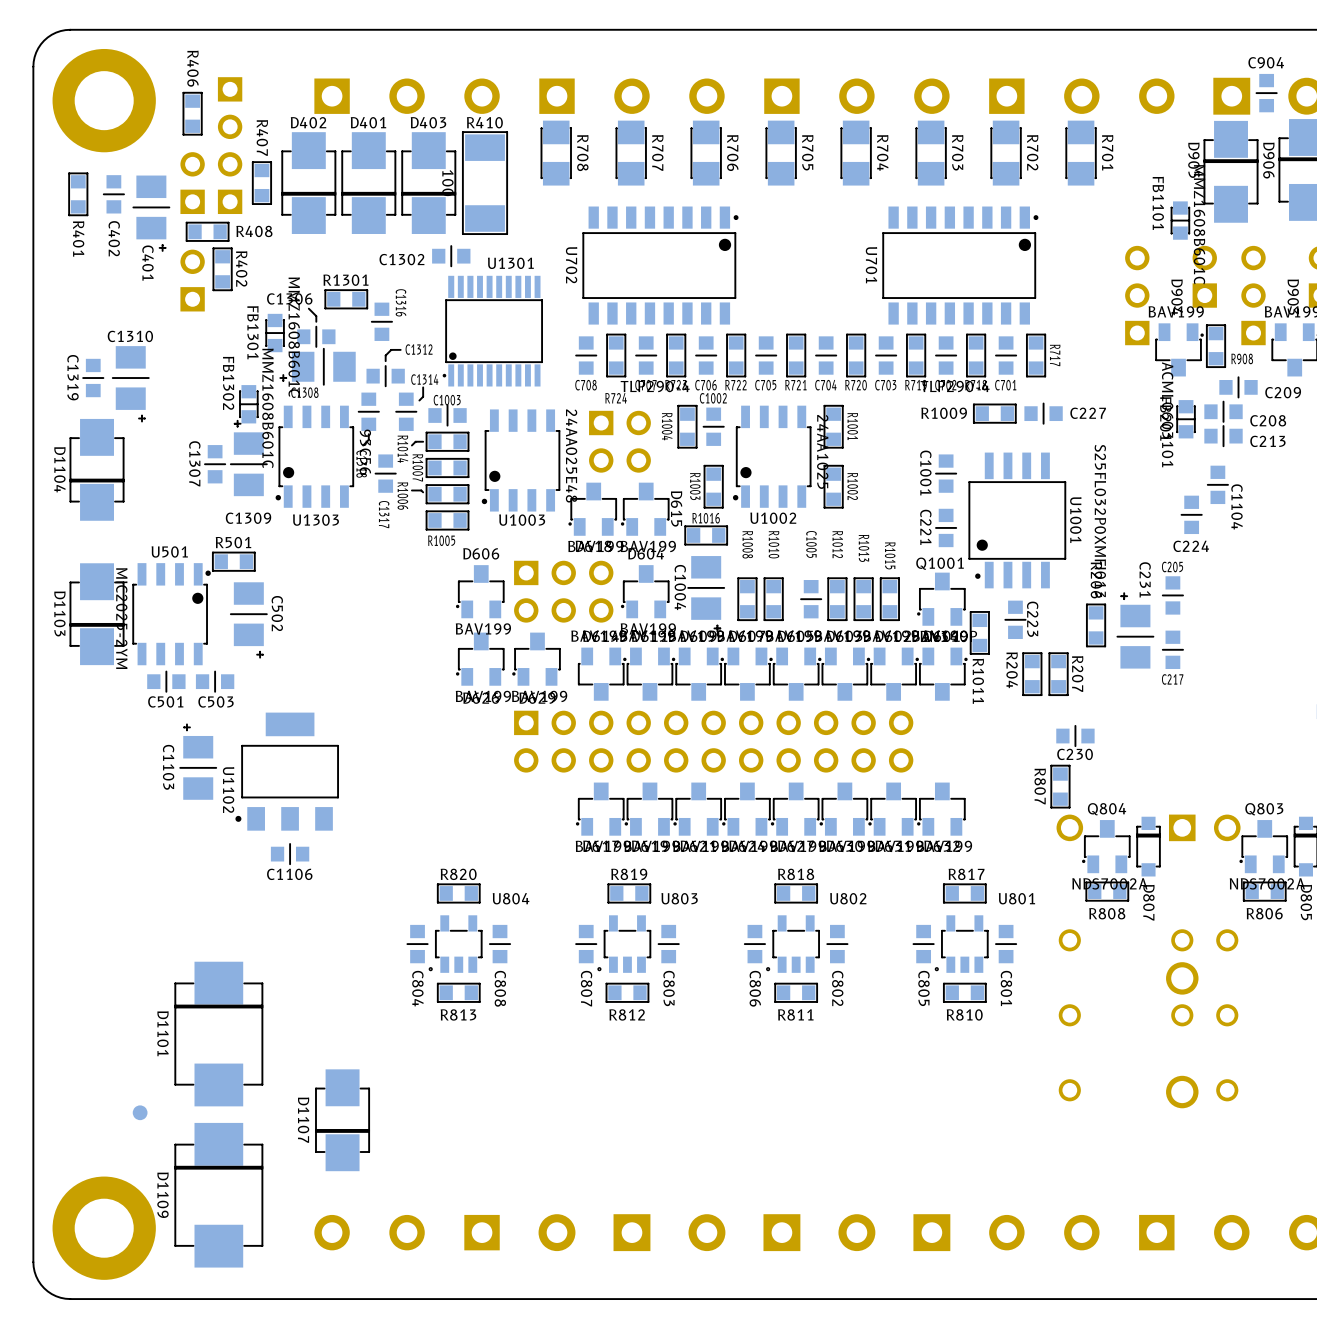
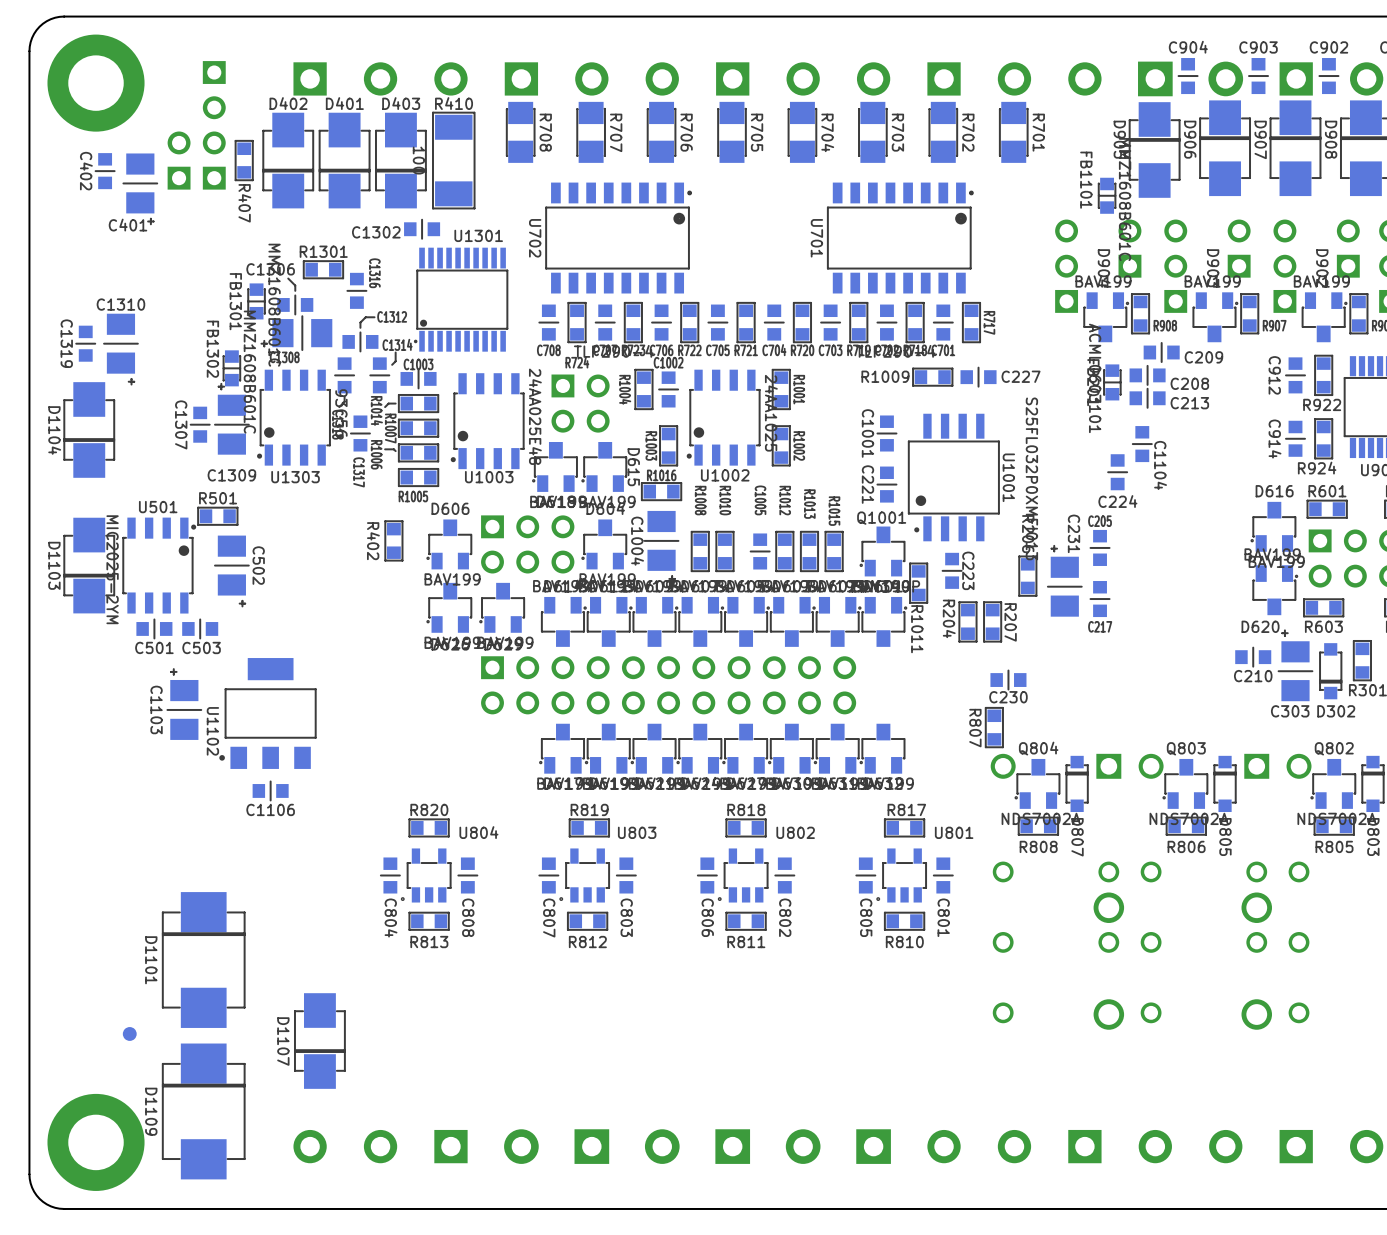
R406: (192, 113) -> none
R407 name position: R407 (262, 137) -> R407 (244, 203)
R401: (78, 194) -> none
R408: (207, 231) -> none
C402 name position: C402 (114, 238) -> C402 (86, 171)
C401 name rotation: 0° (147, 263) -> 90° counterclockwise (128, 225)
R402 name position: R402 (241, 268) -> R402 (373, 541)
R402 position: (222, 269) -> (393, 540)
part: (192, 280) -> none

